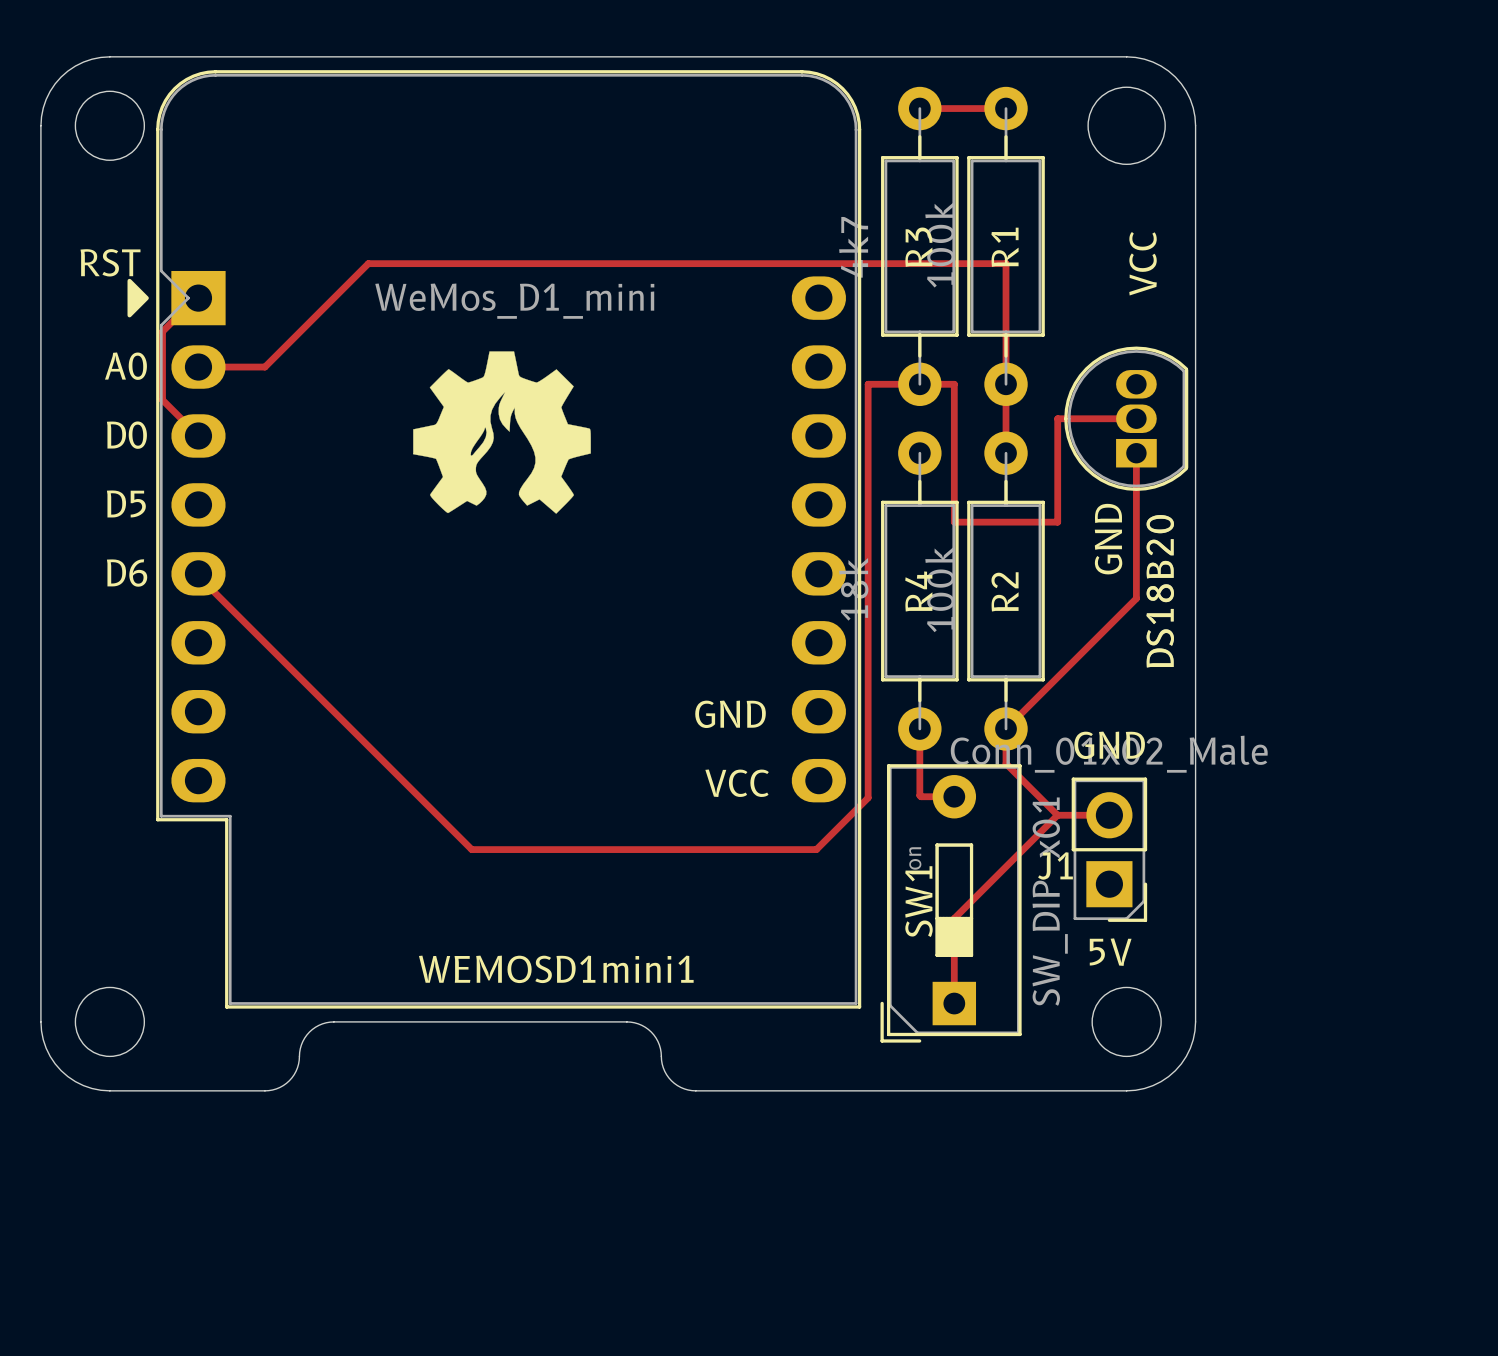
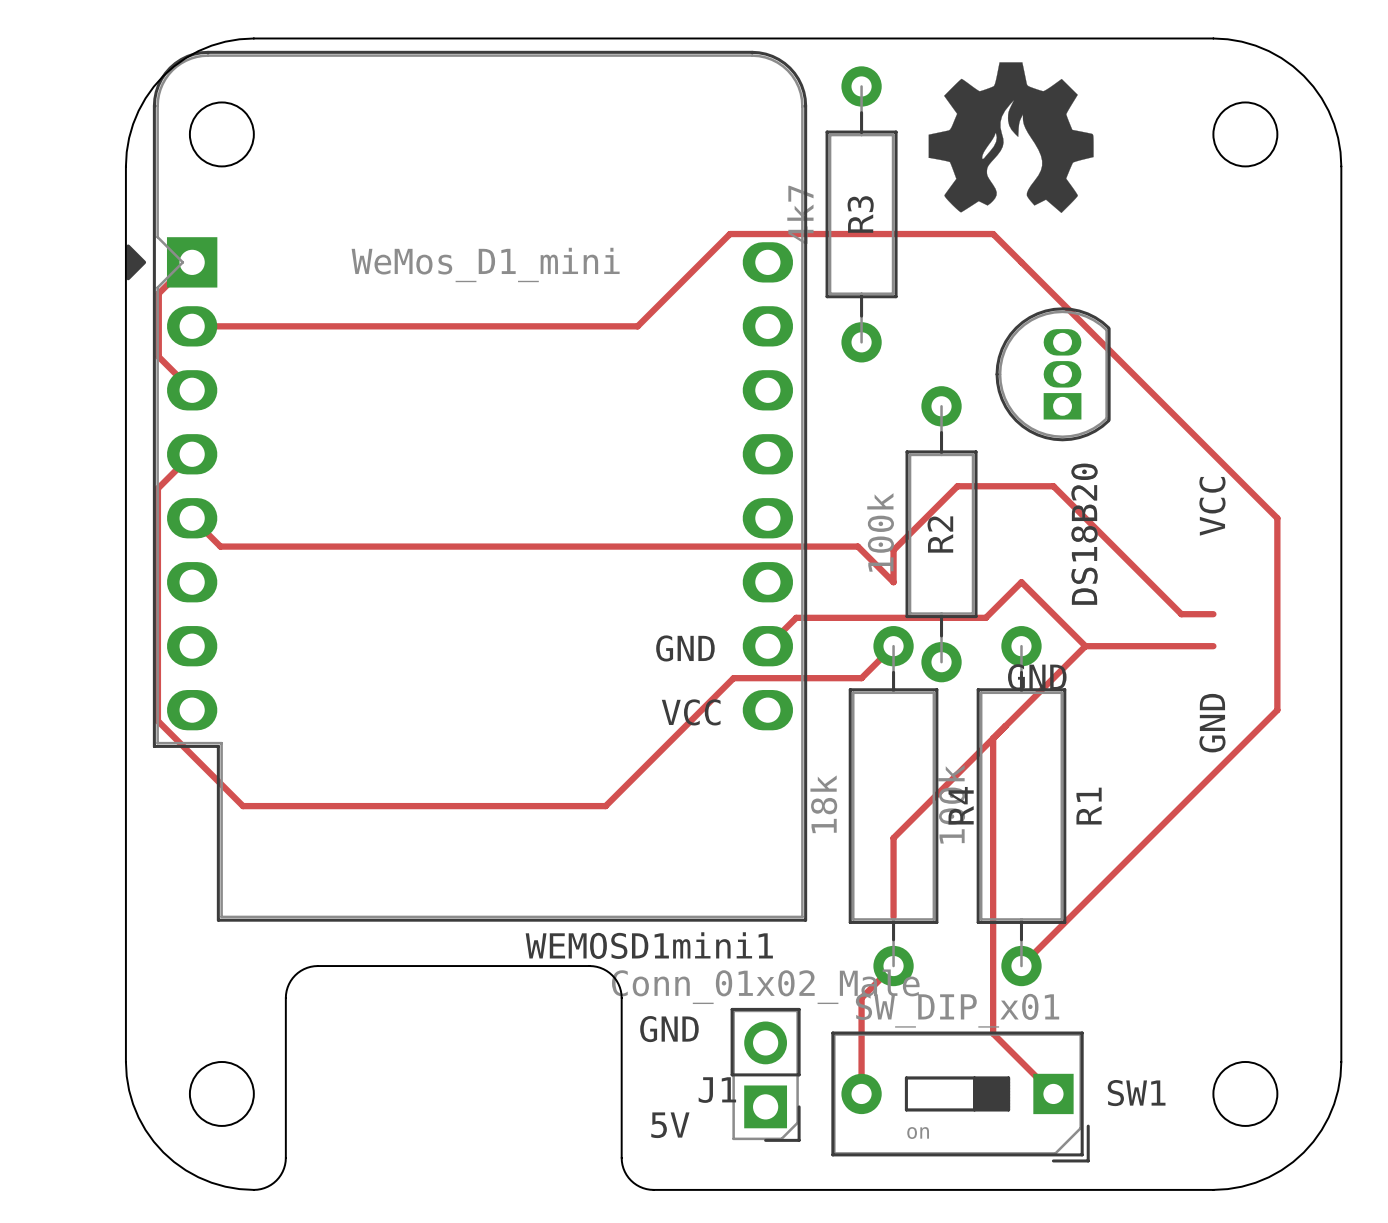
board edge: (264, 56) (109, 56) (92, 59) (75, 66) (61, 77) (46, 99) (41, 116) (40, 1021) (43, 1039) (55, 1063) (75, 1081) (100, 1090) (264, 1090) (276, 1088) (286, 1083) (294, 1074) (298, 1064) (301, 1045) (306, 1034) (318, 1025) (333, 1021) (634, 1022) (645, 1027) (656, 1038) (660, 1048) (663, 1067) (668, 1077) (677, 1085) (691, 1090) (1126, 1090) (1153, 1085) (1175, 1070) (1190, 1048) (1195, 1021) (1195, 125) (1190, 99) (1175, 77) (1153, 62) (1126, 56) -> (253, 38) (225, 41) (198, 51) (174, 66) (163, 75) (153, 86) (138, 110) (133, 124) (126, 152) (125, 1061) (126, 1076) (133, 1104) (145, 1130) (153, 1141) (174, 1162) (198, 1177) (211, 1182) (239, 1189) (257, 1189) (270, 1185) (278, 1177) (284, 1168) (285, 1157) (286, 994) (292, 978) (307, 967) (317, 966) (589, 966) (600, 967) (609, 973) (616, 980) (620, 990) (621, 1161) (628, 1177) (643, 1188) (653, 1189) (1227, 1189) (1241, 1186) (1268, 1177) (1281, 1170) (1303, 1152) (1321, 1130) (1328, 1117) (1338, 1090) (1340, 1076) (1340, 152) (1334, 124) (1321, 98) (1313, 86) (1303, 75) (1281, 58) (1255, 45) (1241, 41) (1213, 38) (1053, 38)
R1 footprint: [967, 86, 1045, 406] -> [976, 626, 1067, 987]
round board edge: [1087, 86, 1166, 165] -> none
track: (919, 108) (1006, 108) -> none
round board edge position: (109, 125) -> (221, 134)
round board edge: none -> [1212, 101, 1278, 168]
R1 name position: R1 (1005, 247) -> R1 (1089, 806)
text: RST (110, 262) -> none
text position: VCC (1143, 263) -> VCC (1212, 506)
text: A0 (125, 366) -> none
track: (264, 367) (368, 263) (1006, 263) (1006, 453) -> (253, 326) (637, 326) (729, 234) (993, 234) (1277, 518) (1277, 710) (1021, 966)
track: (1136, 418) (1057, 418) (1057, 522) (954, 522) (954, 384) (868, 384) (868, 797) (816, 849) (471, 849) (198, 576) (198, 573) -> (1213, 614) (1181, 614) (1053, 486) (957, 486) (893, 550) (893, 582) (857, 546) (220, 546) (192, 518)
R4 footprint: [881, 431, 959, 751] -> [848, 626, 939, 987]
drawing position: (502, 432) -> (1011, 137)
text: D0 (126, 435) -> none
track: (1136, 453) (1136, 598) (1092, 642) -> (1085, 646) (1021, 582)
text: D5 (126, 503) -> none
track: none -> (192, 454) (157, 488) (157, 721) (243, 806) (605, 806) (733, 678) (861, 678) (893, 646)
text position: GND (1108, 539) -> GND (1212, 723)
text: D6 (127, 573) -> none
R4 name position: R4 (918, 591) -> R4 (961, 805)
track: (1053, 681) (1006, 728) (1006, 763) (1057, 815) (1109, 815) -> (985, 617) (796, 617) (767, 646)
track: none -> (1085, 646) (1213, 646)
track: none -> (1085, 646) (989, 742)
track: (919, 728) (919, 795) (954, 796) -> none
track: none -> (993, 738) (993, 1033) (1053, 1093)
J1 position: (1109, 849) -> (765, 1074)
SW1 name position: SW1 (918, 901) -> SW1 (1136, 1093)
SW1 rotation: 0° (951, 903) -> 90° counterclockwise (960, 1096)
SW1 position: (951, 903) -> (960, 1096)
text position: 5V (1110, 952) -> 5V (670, 1125)
WEMOSD1mini1 name position: WEMOSD1mini1 (556, 969) -> WEMOSD1mini1 (649, 945)
round board edge position: (109, 1021) -> (221, 1093)
round board edge position: (1126, 1021) -> (1245, 1093)
track: none -> (893, 966) (861, 998) (861, 1093)
text: none -> GND (669, 1029)

